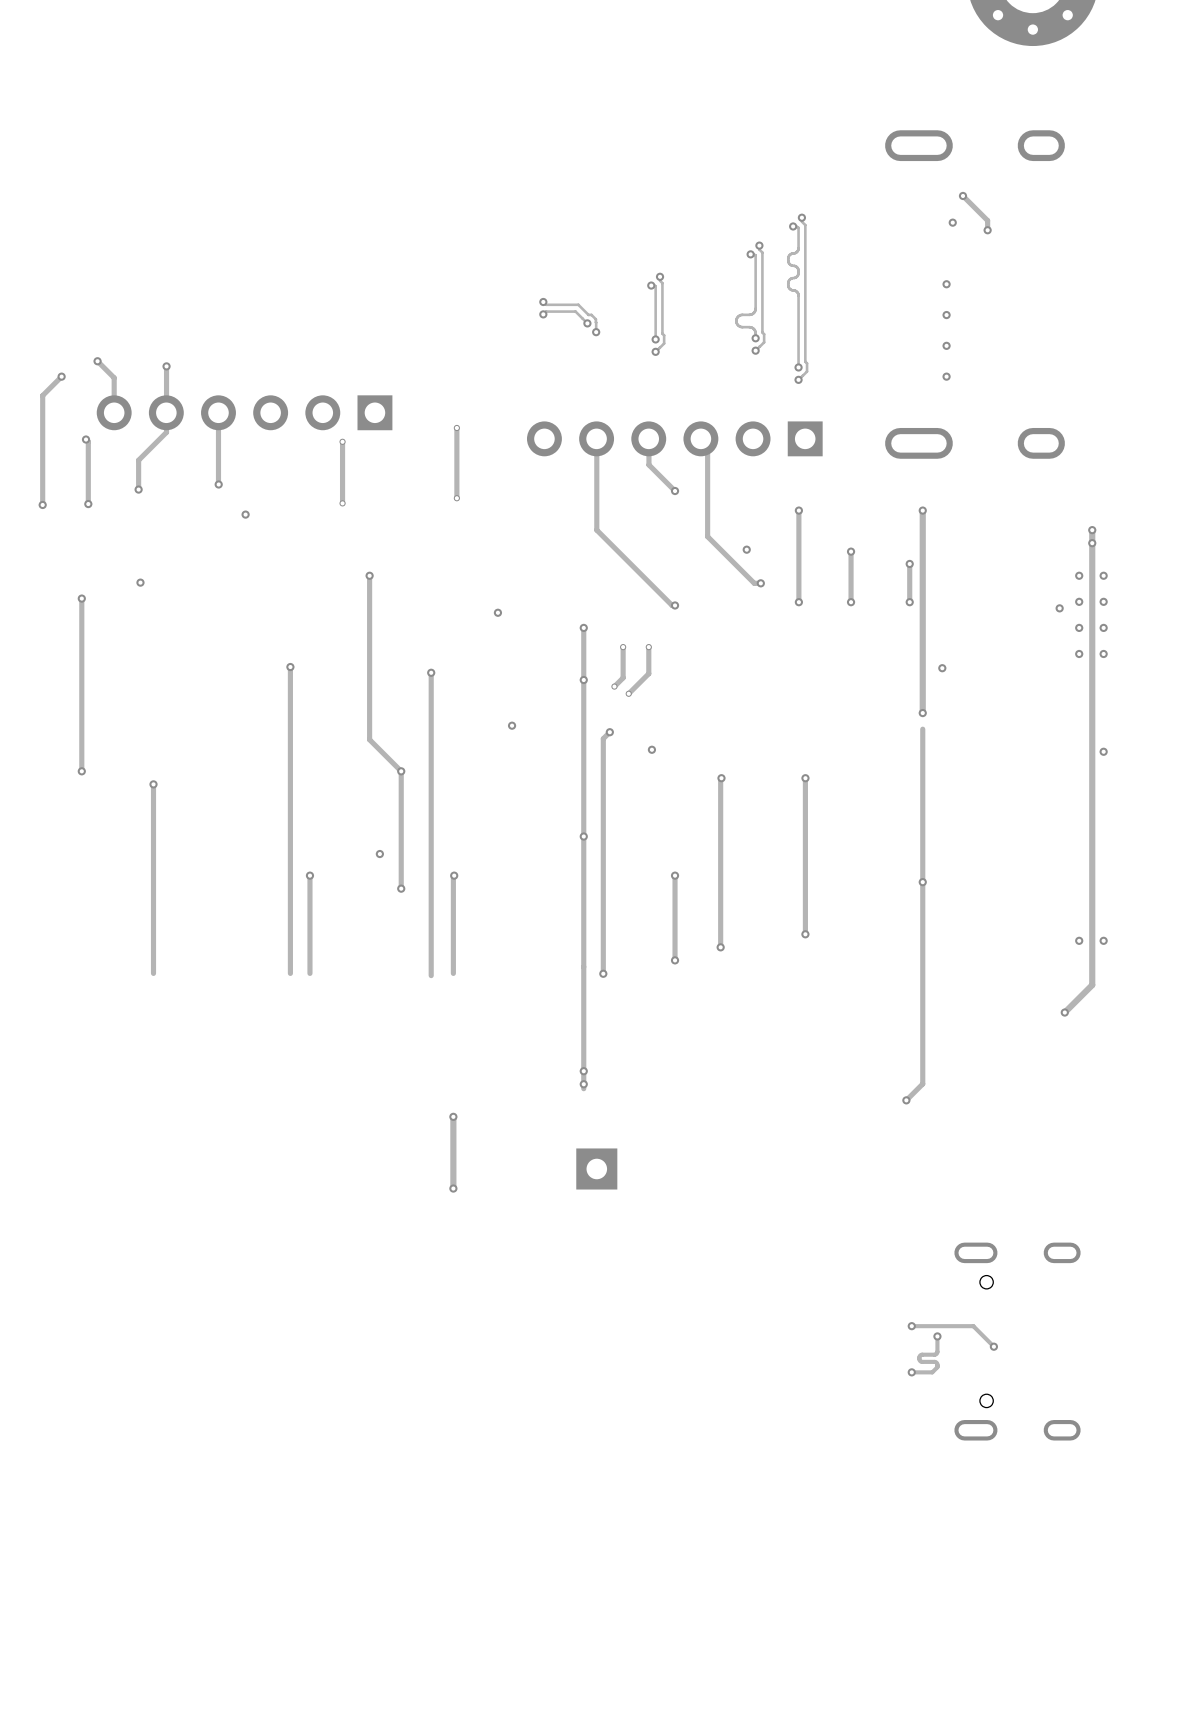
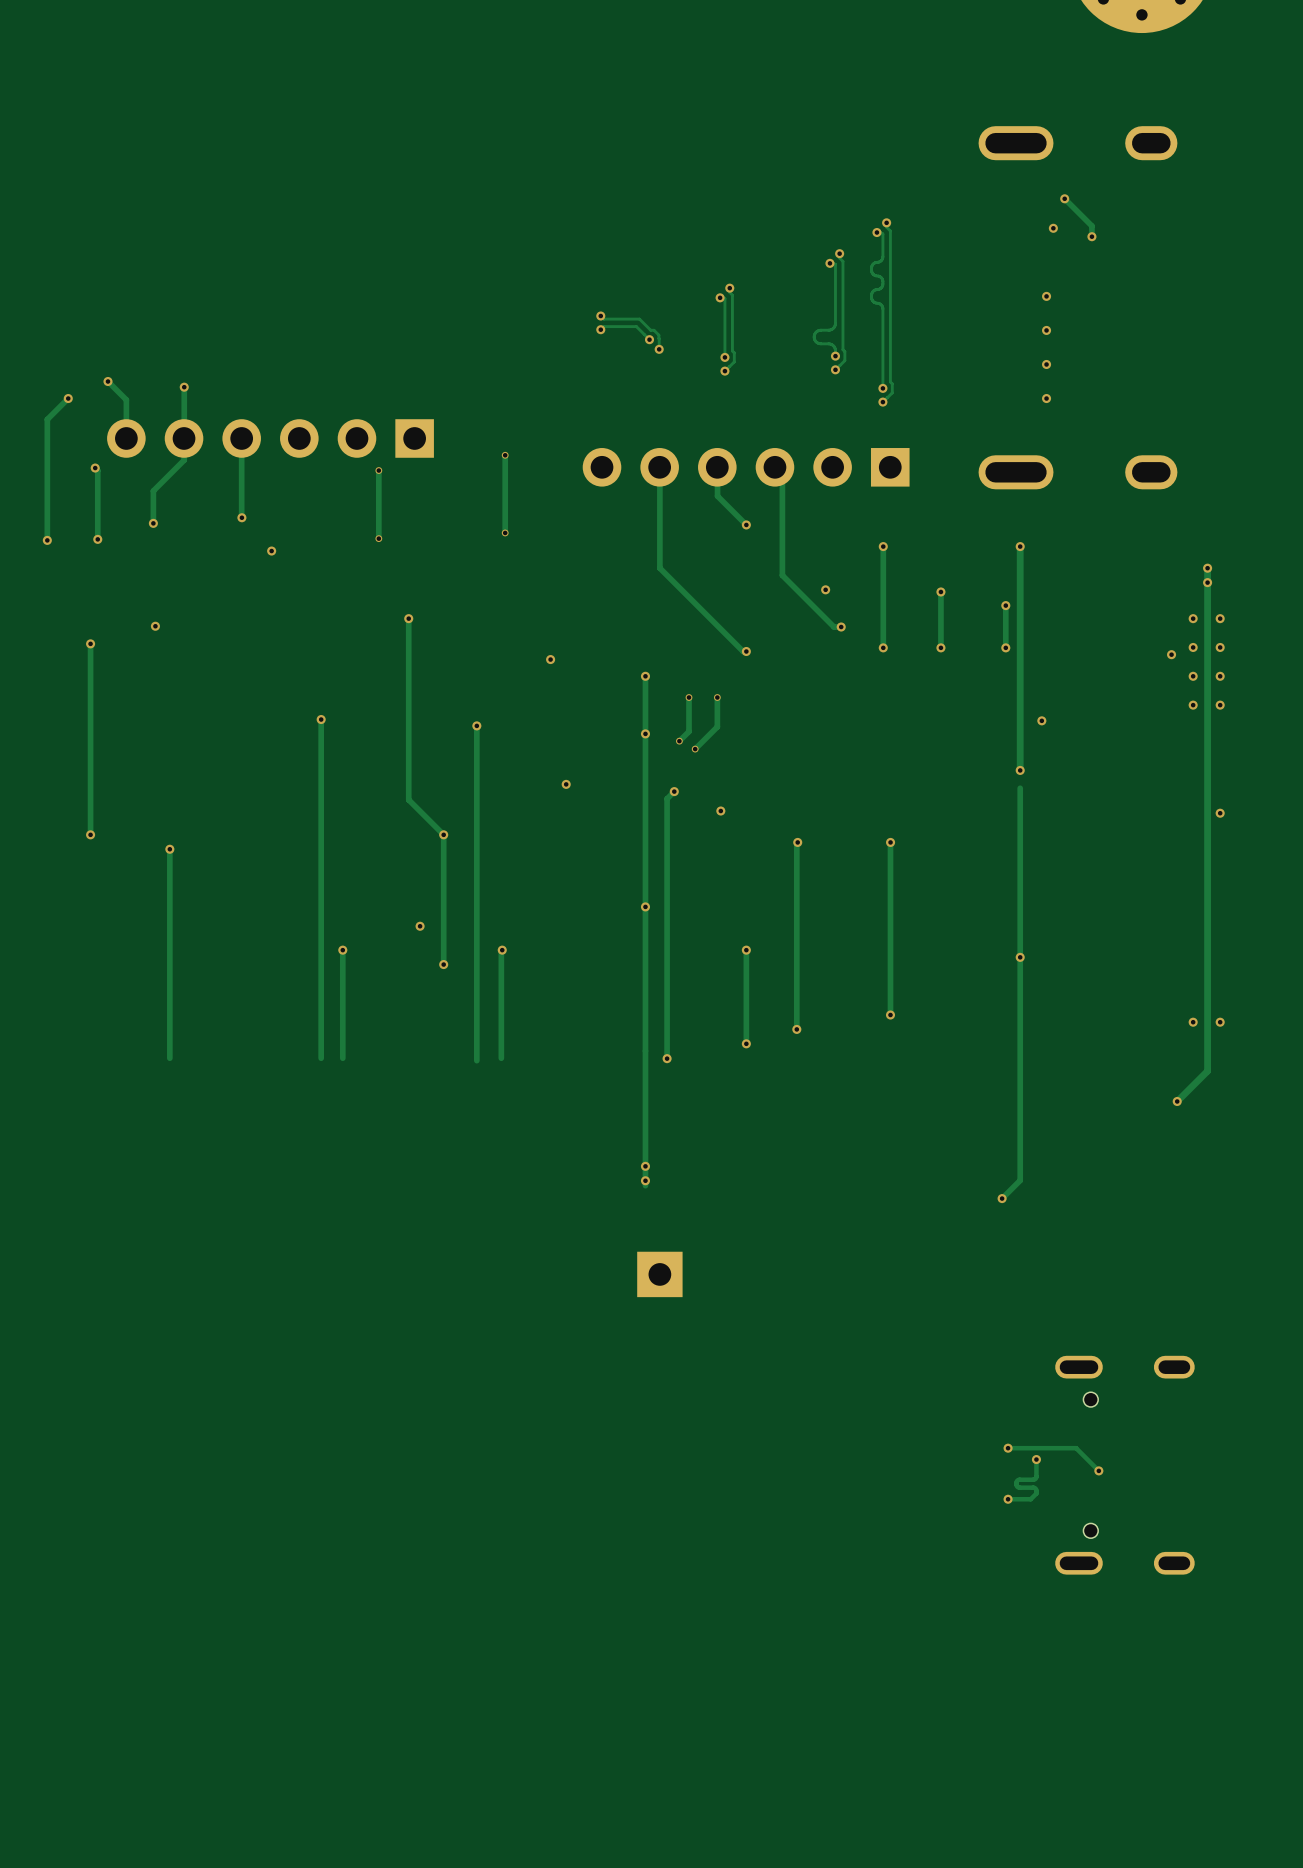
track: (453, 1116) (453, 1188) -> none
via: (453, 1116) -> none
via: (453, 1188) -> none

